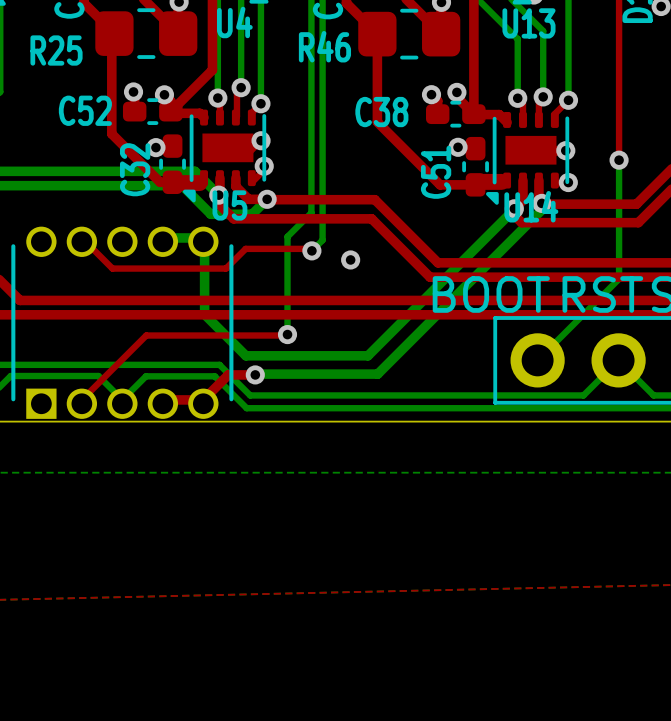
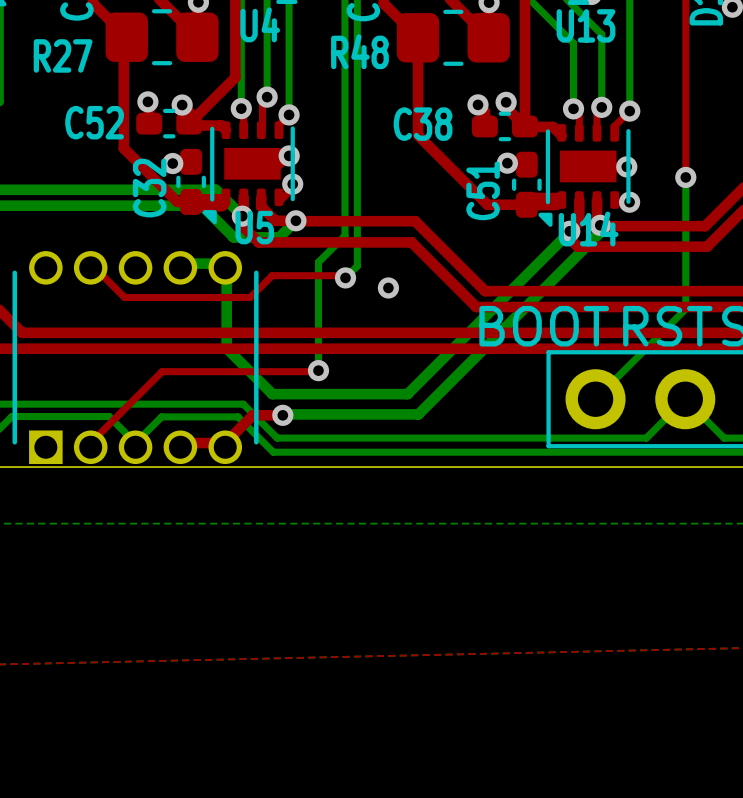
R46 name: R46 (324, 46) -> R48 (359, 51)
R25 name: R25 (56, 50) -> R27 (63, 55)

